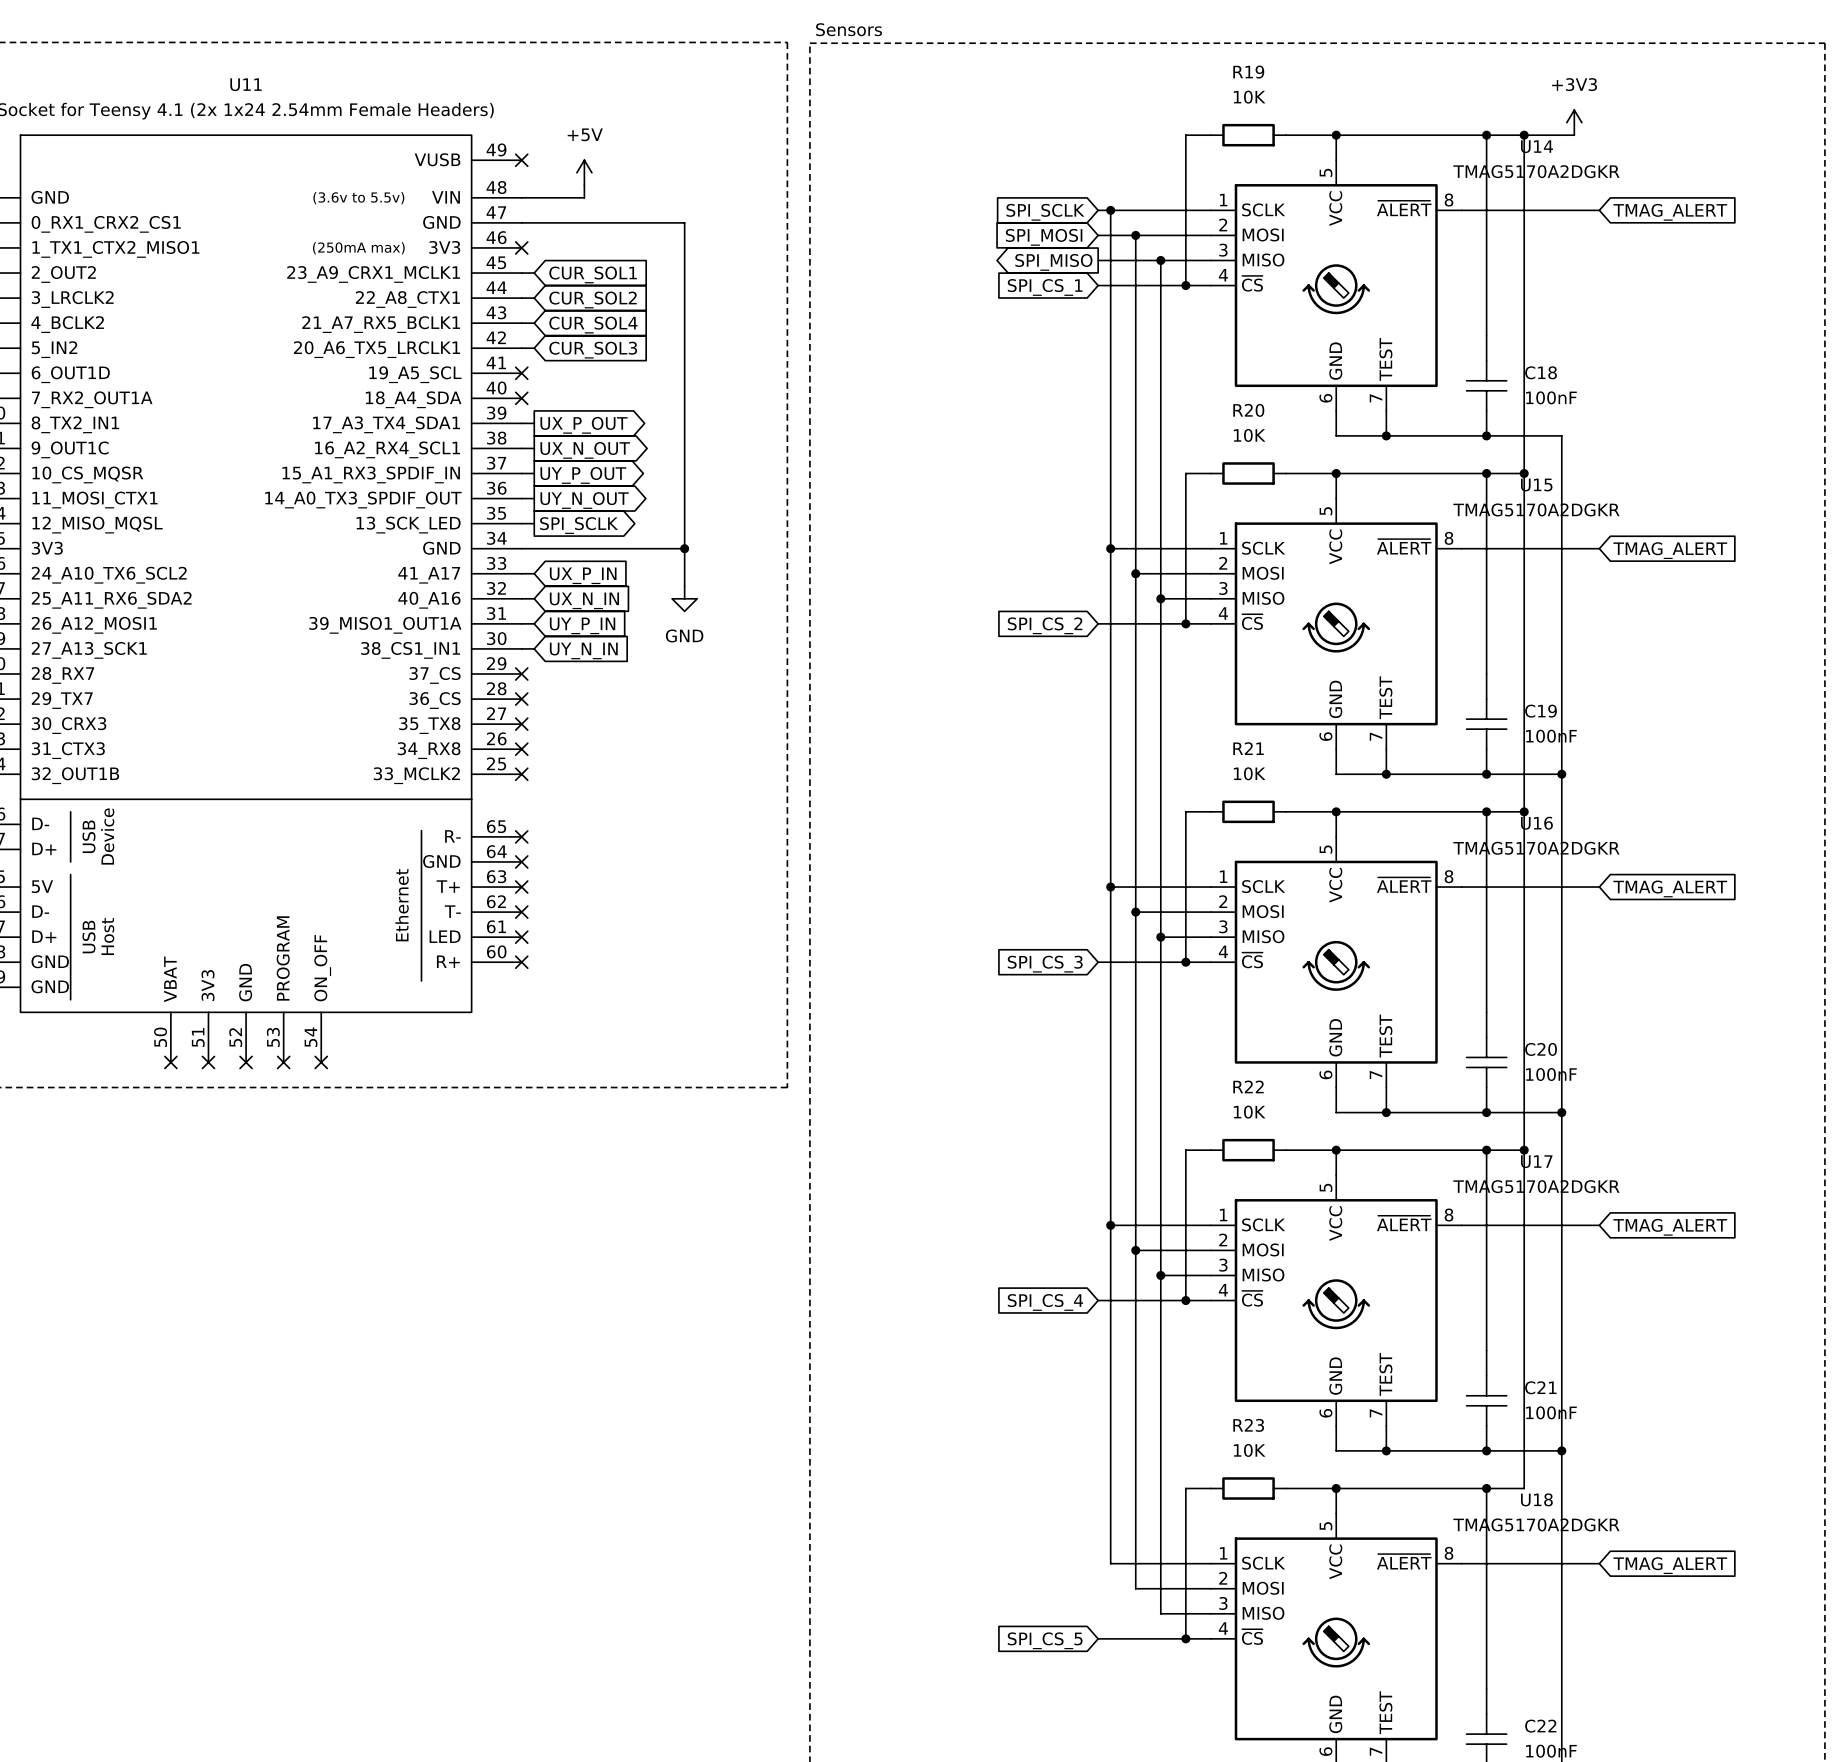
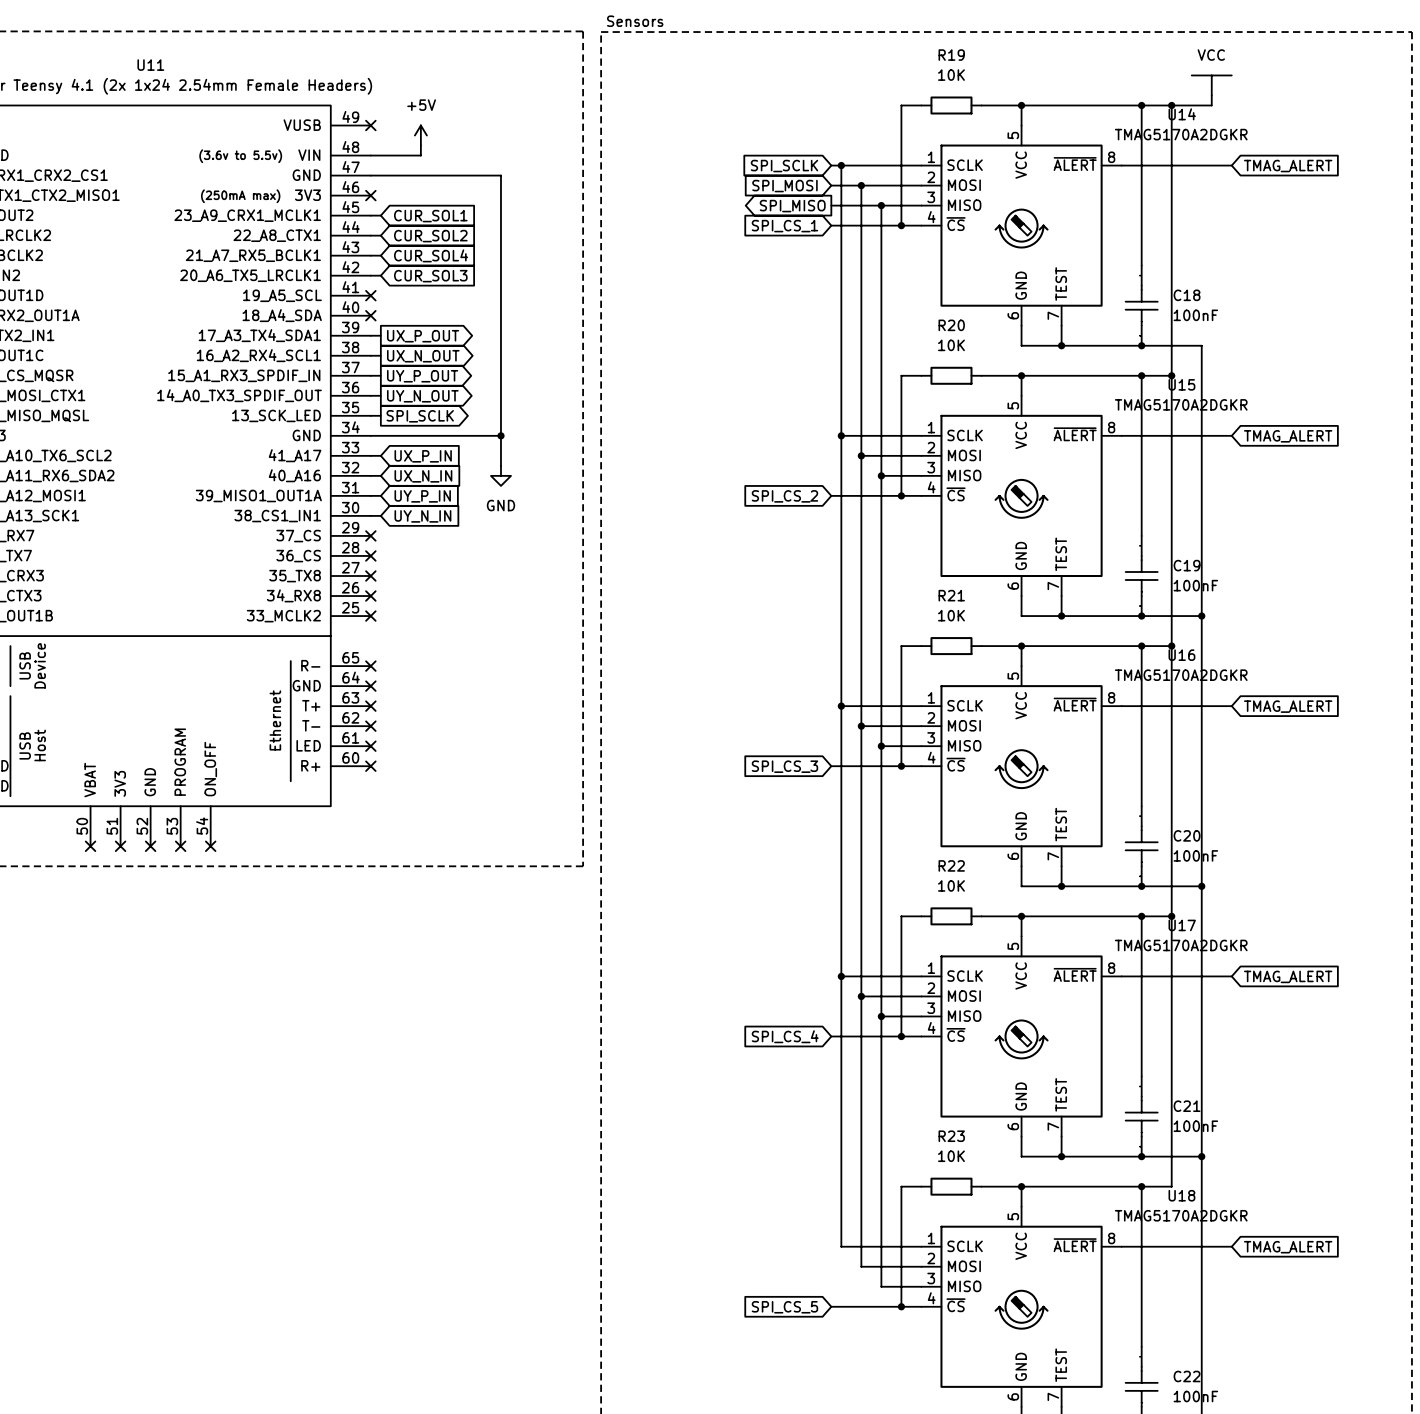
power symbol: +3V3 (1574, 122) -> VCC (1211, 90)

